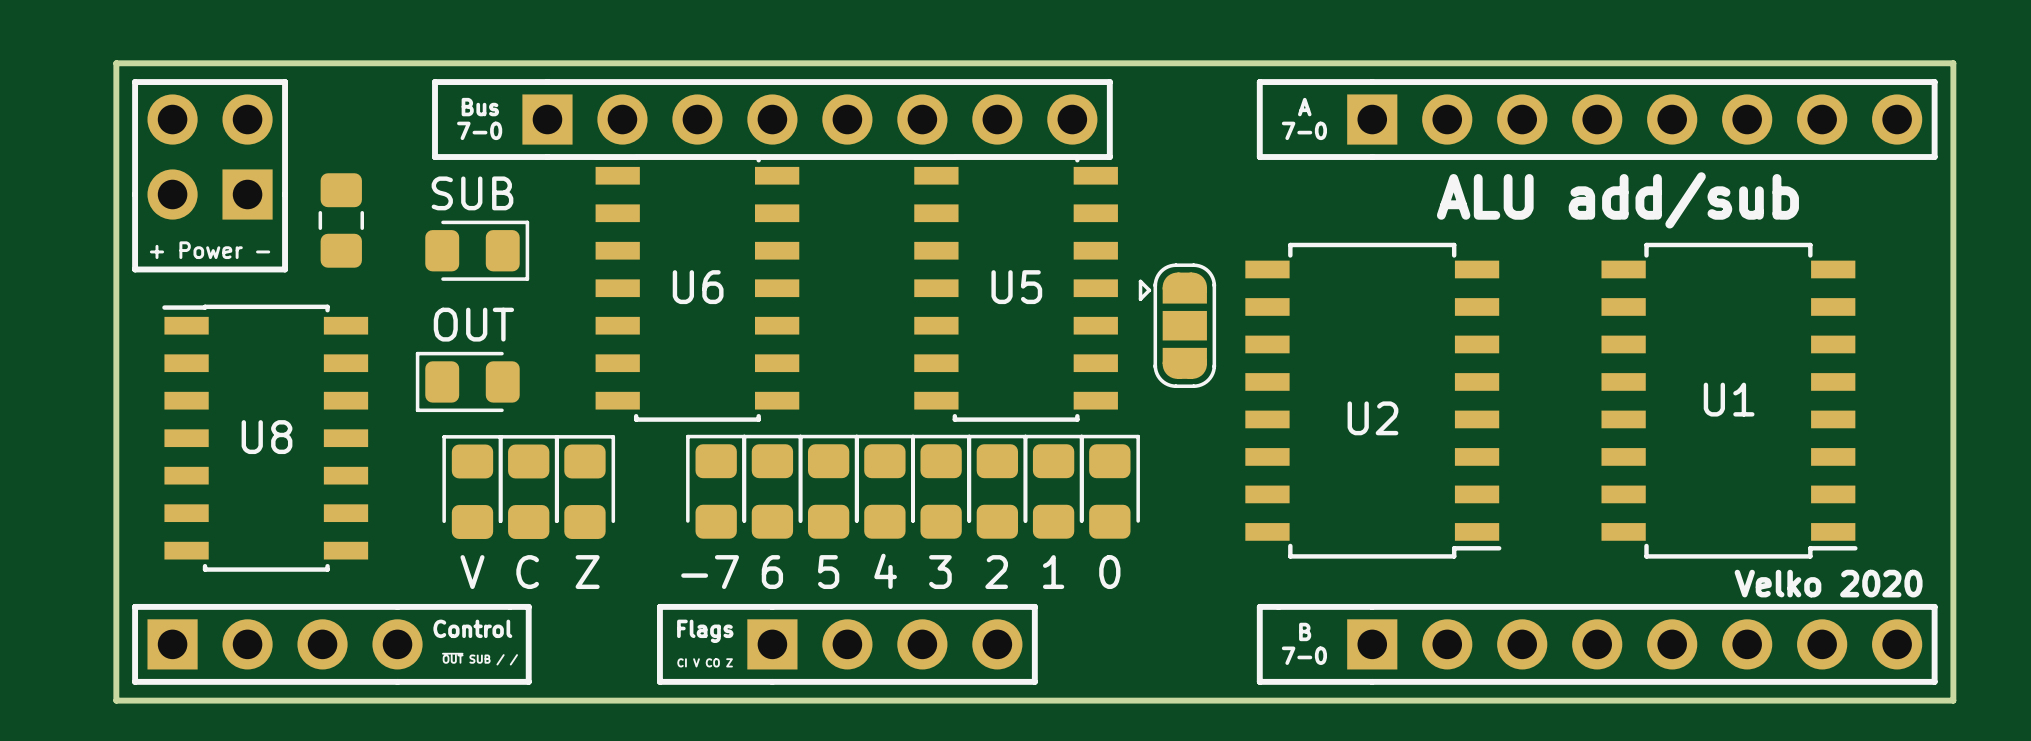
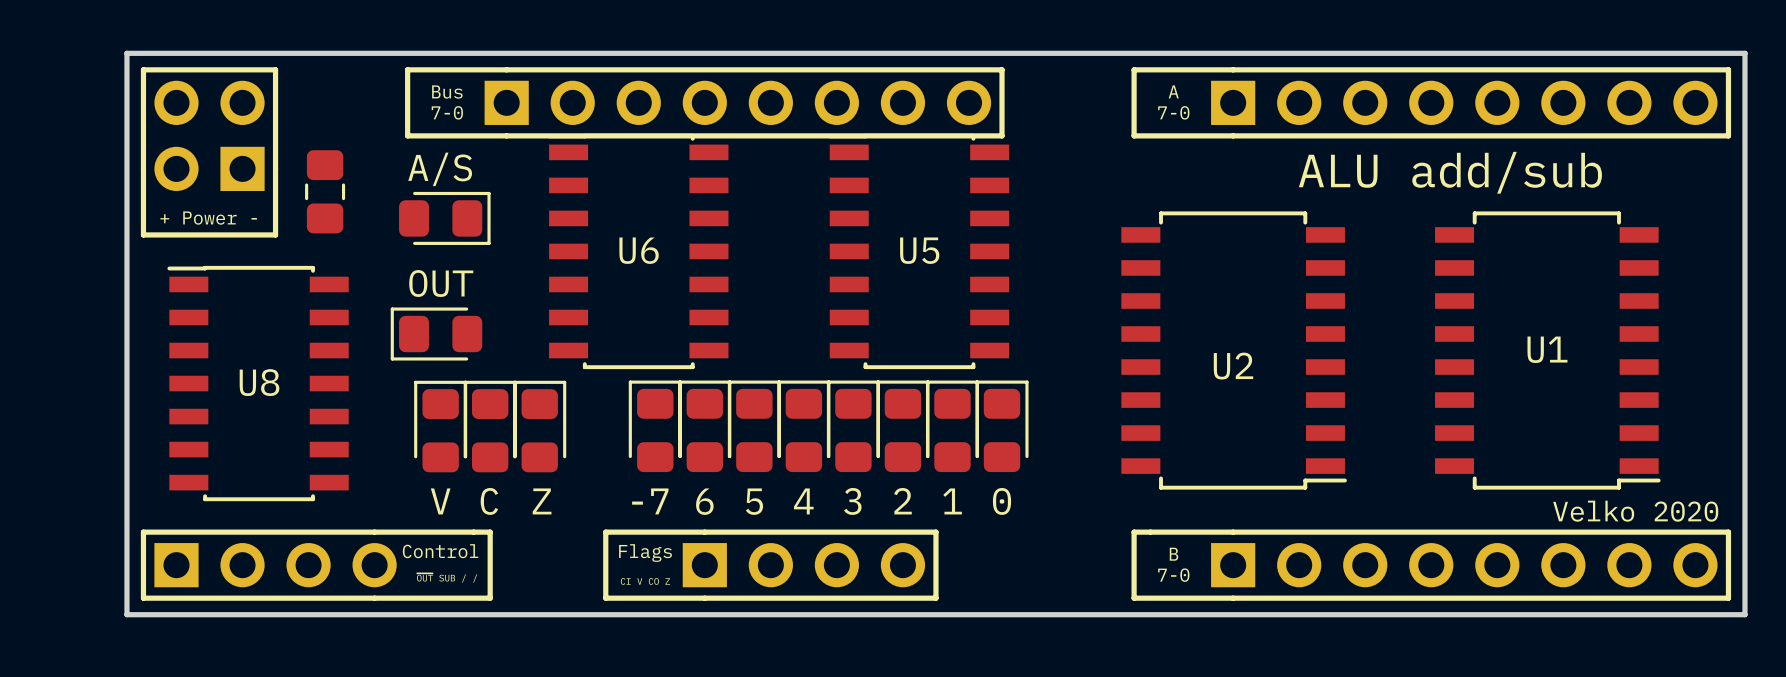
part value: SUB (472, 193) -> A/S (440, 169)
part: (1177, 325) -> none

